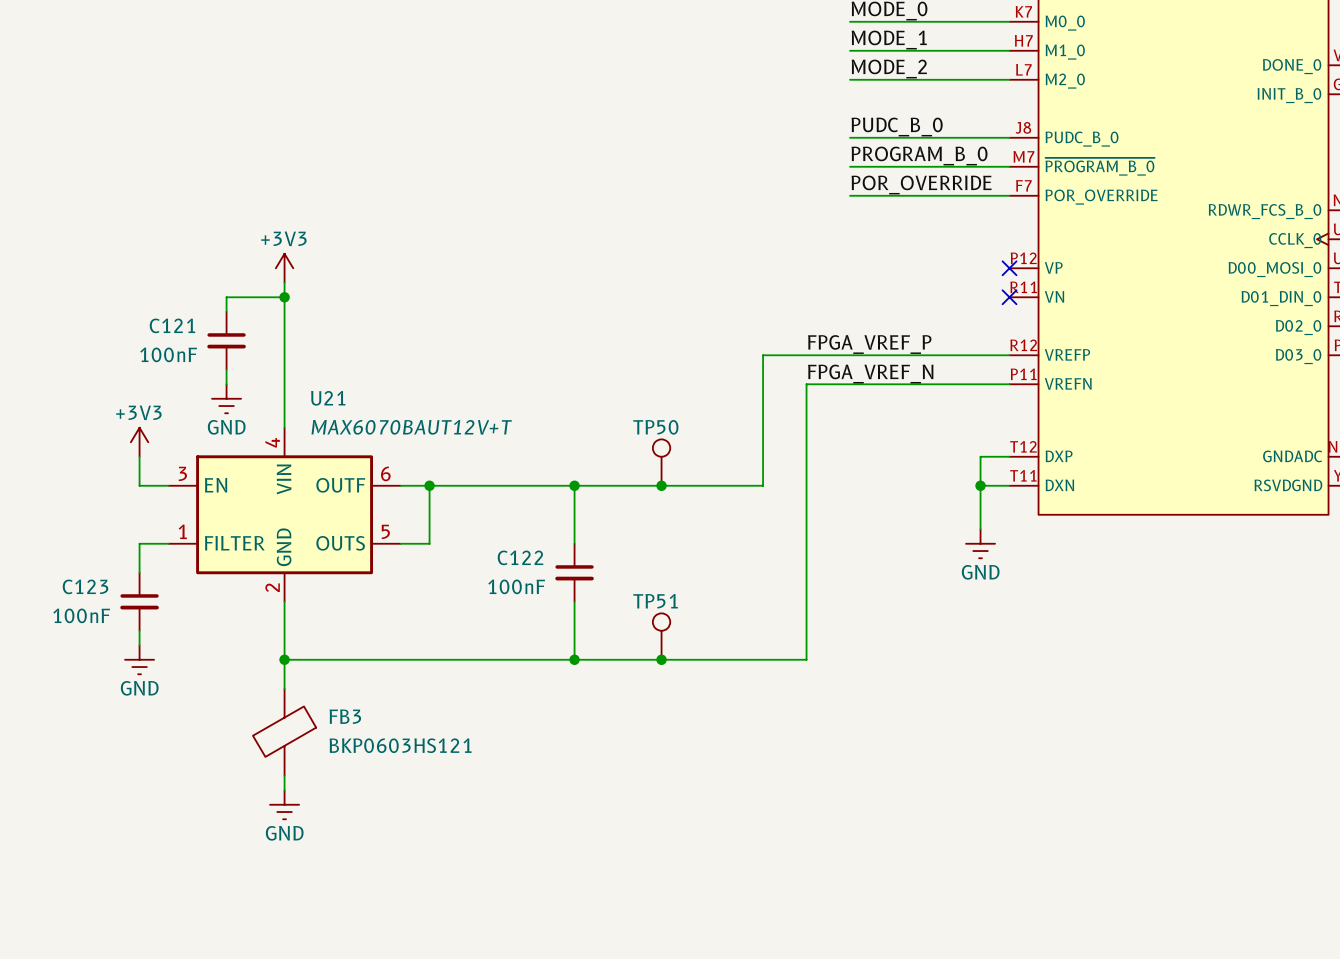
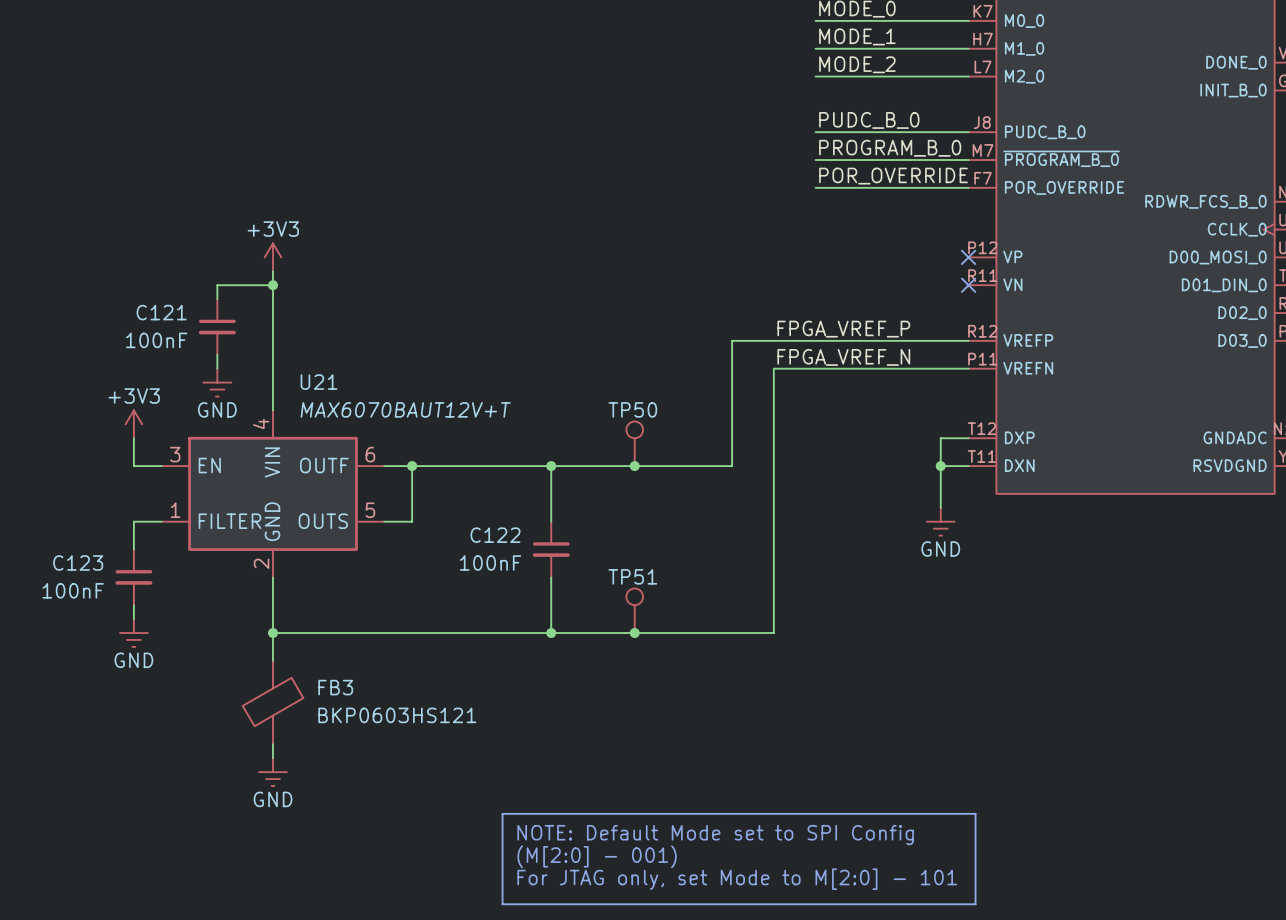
line: none -> (502, 813) (975, 813) (975, 904) (502, 904) (502, 813)
text: none -> NOTE: Default Mode set to SPI Config (715, 835)
text: none -> (M[2:0] - 001) (597, 856)
text: none -> For JTAG only, set Mode to M[2:0] - 101 (737, 879)

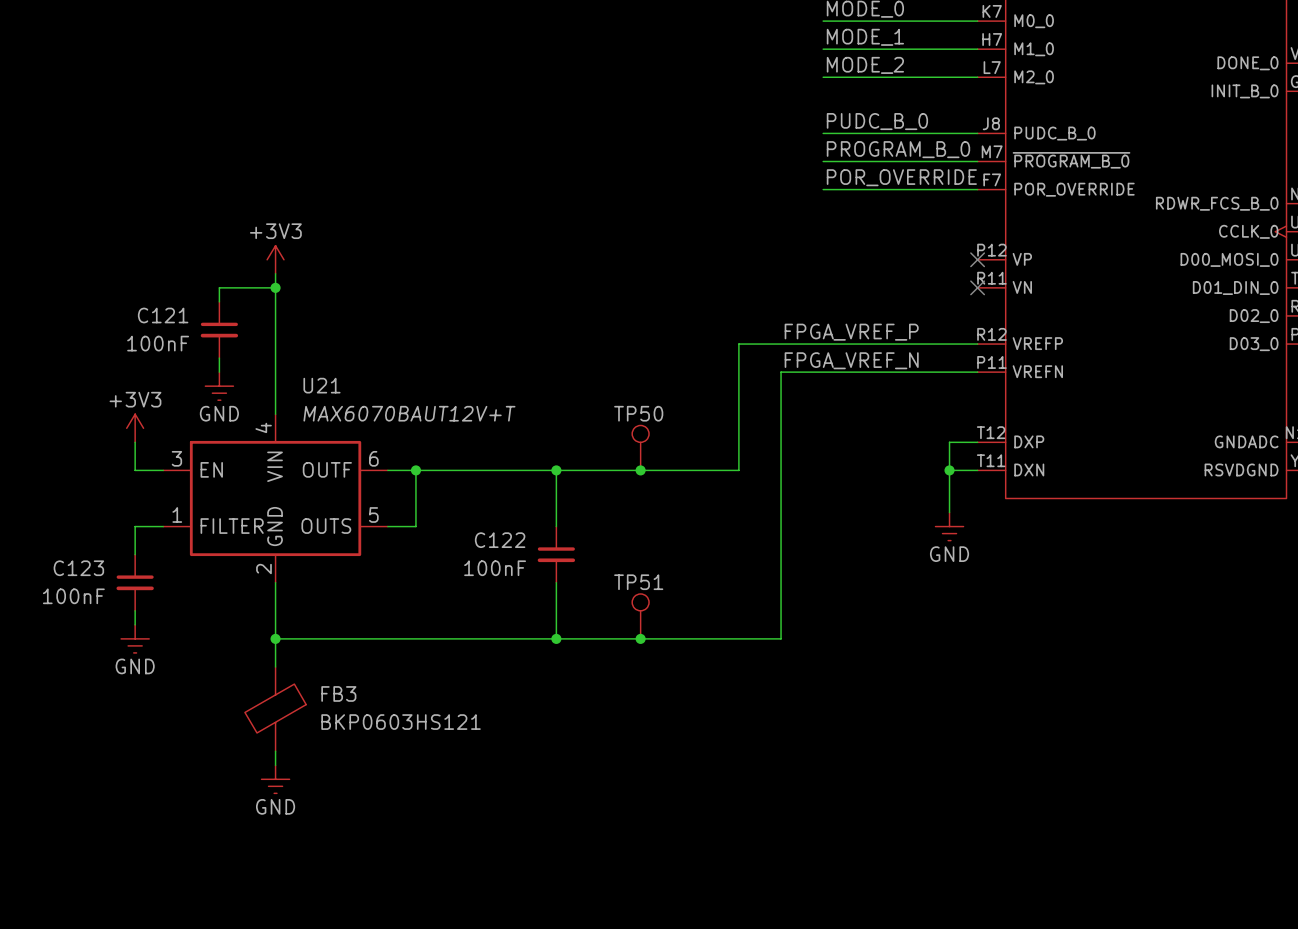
line: (502, 813) (975, 813) (975, 904) (502, 904) (502, 813) -> none
text: NOTE: Default Mode set to SPI Config (715, 835) -> none
text: (M[2:0] - 001) (597, 856) -> none
text: For JTAG only, set Mode to M[2:0] - 101 (737, 879) -> none

